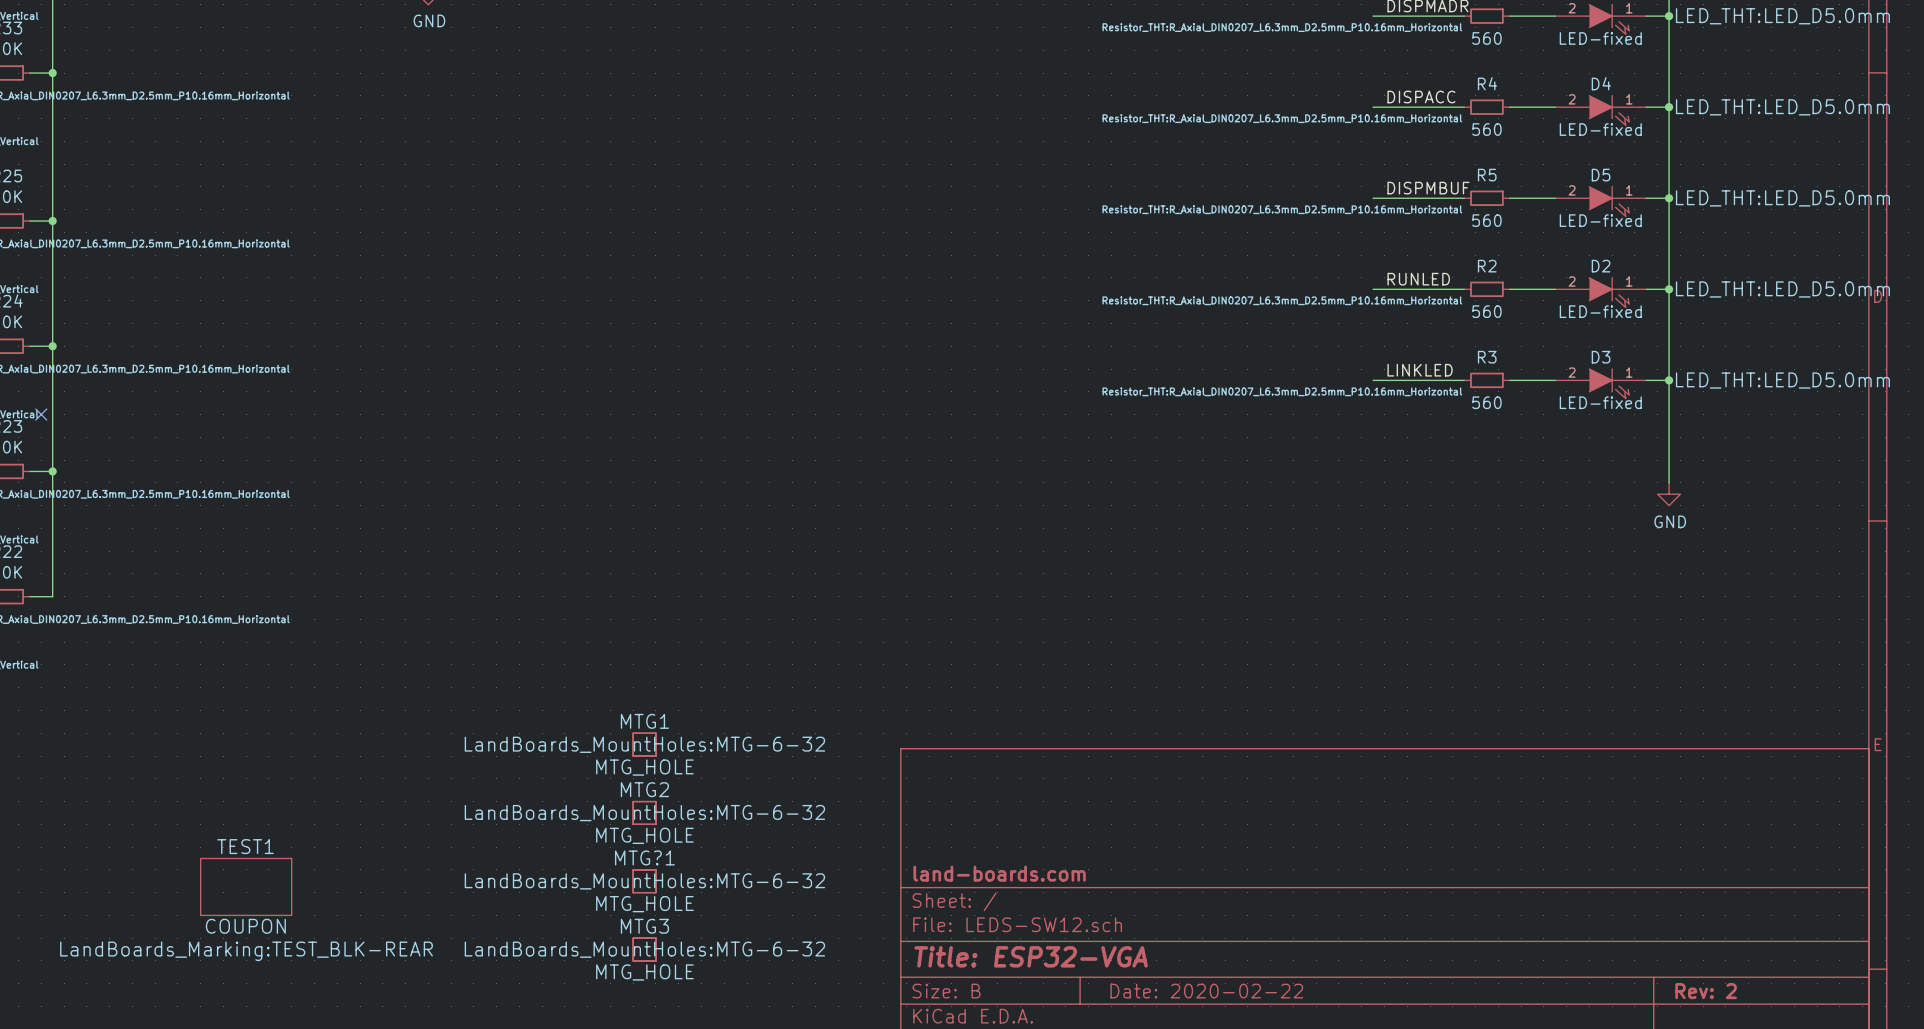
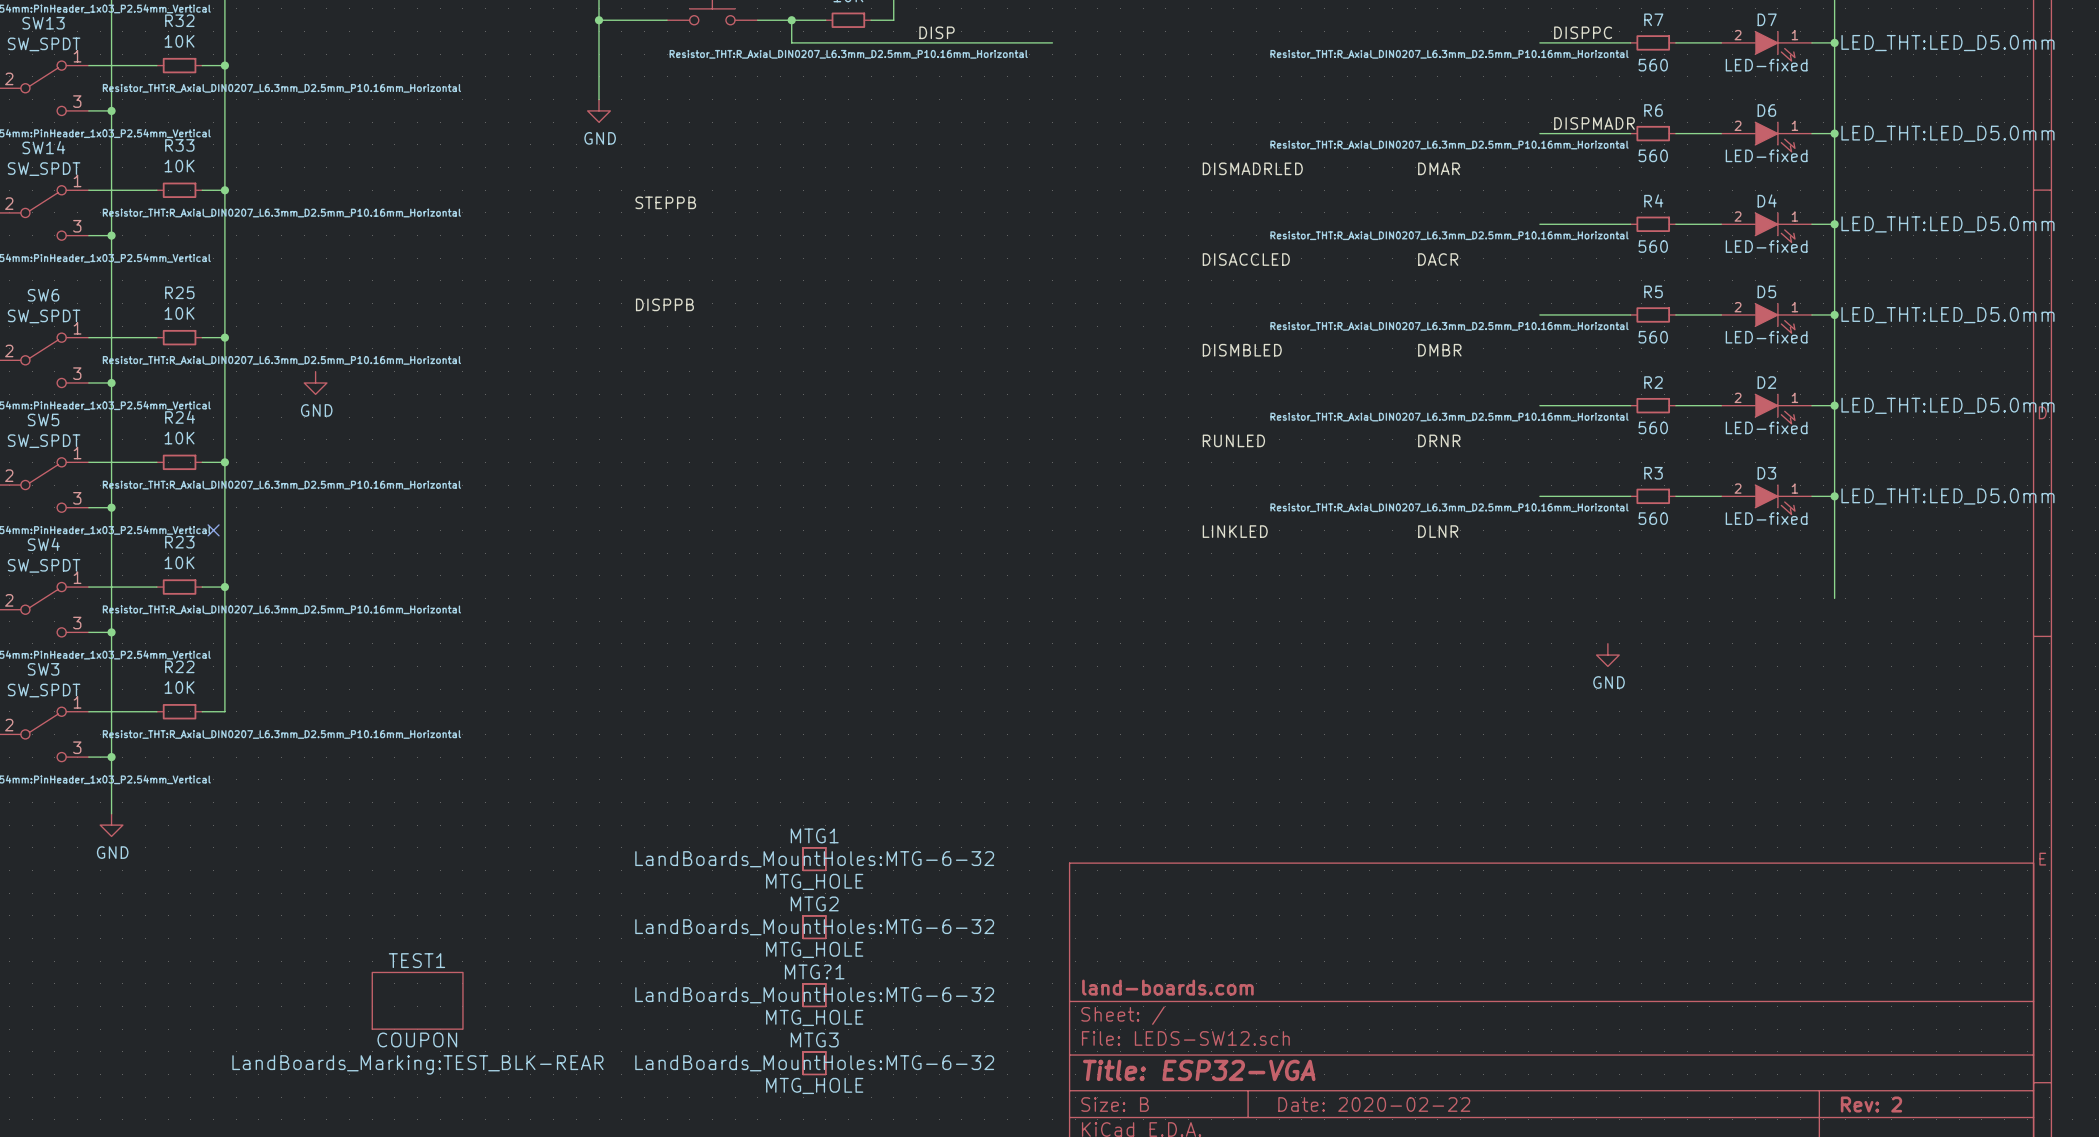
label: none -> DISMADRLED (1252, 168)
label: none -> DMAR (1439, 168)
label: none -> STEPPB (665, 202)
label: DISPACC (1421, 97) -> none
label: none -> DISACCLED (1246, 259)
label: none -> DACR (1438, 259)
label: none -> DISPPB (664, 304)
label: DISPMBUF (1428, 188) -> none
label: none -> DISMBLED (1242, 350)
label: none -> DMBR (1439, 350)
power symbol: none -> GND (315, 382)
label: RUNLED (1418, 279) -> none
label: none -> RUNLED (1233, 440)
label: none -> DRNR (1439, 440)
label: LINKLED (1420, 370) -> none
label: none -> LINKLED (1235, 531)
label: none -> DLNR (1438, 531)
power symbol: GND (1669, 494) -> none
power symbol: none -> GND (1607, 655)

